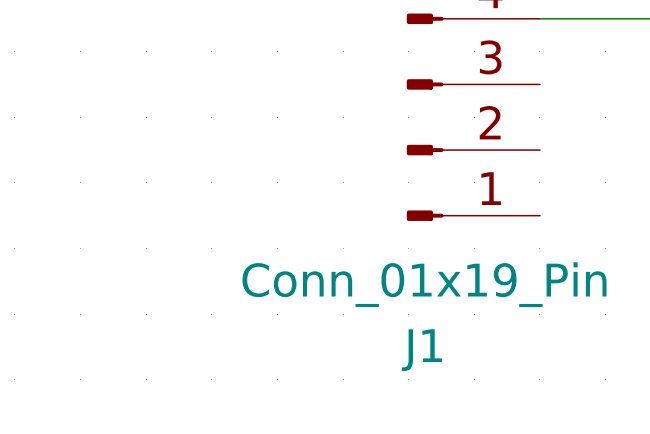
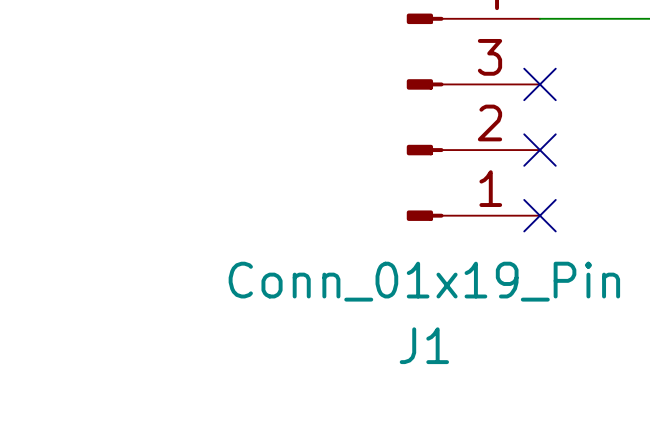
no-connect mark: none -> (539, 84)
no-connect mark: none -> (539, 150)
no-connect mark: none -> (539, 215)

